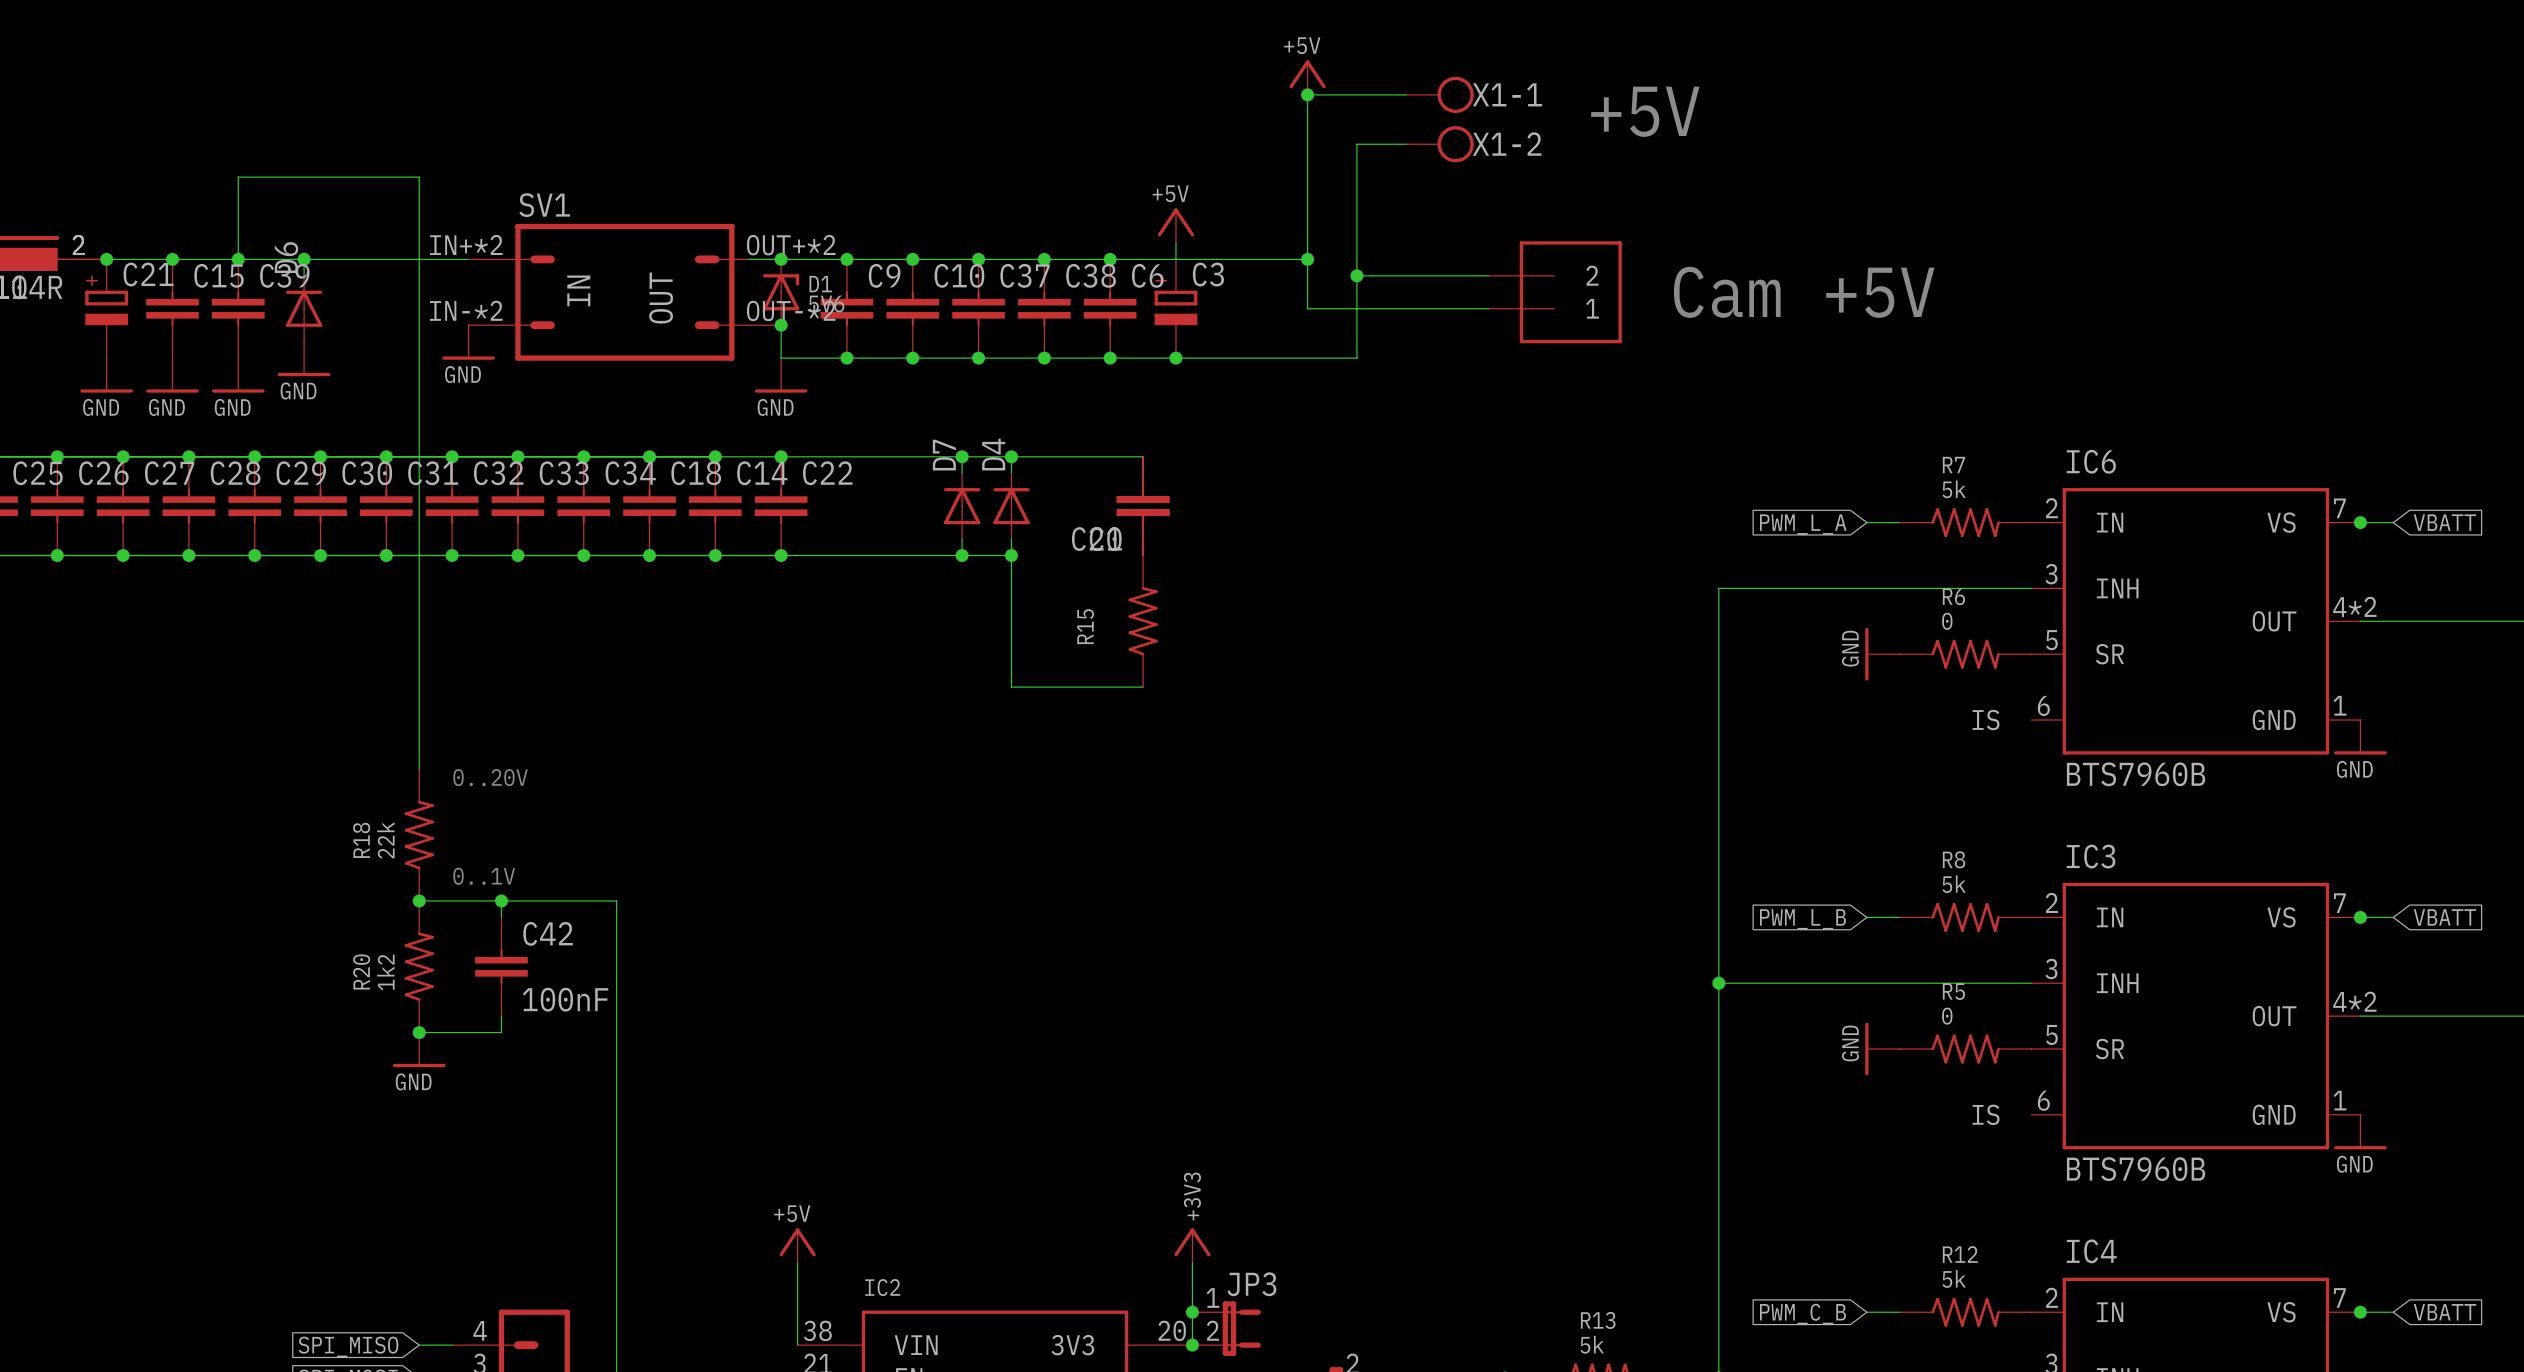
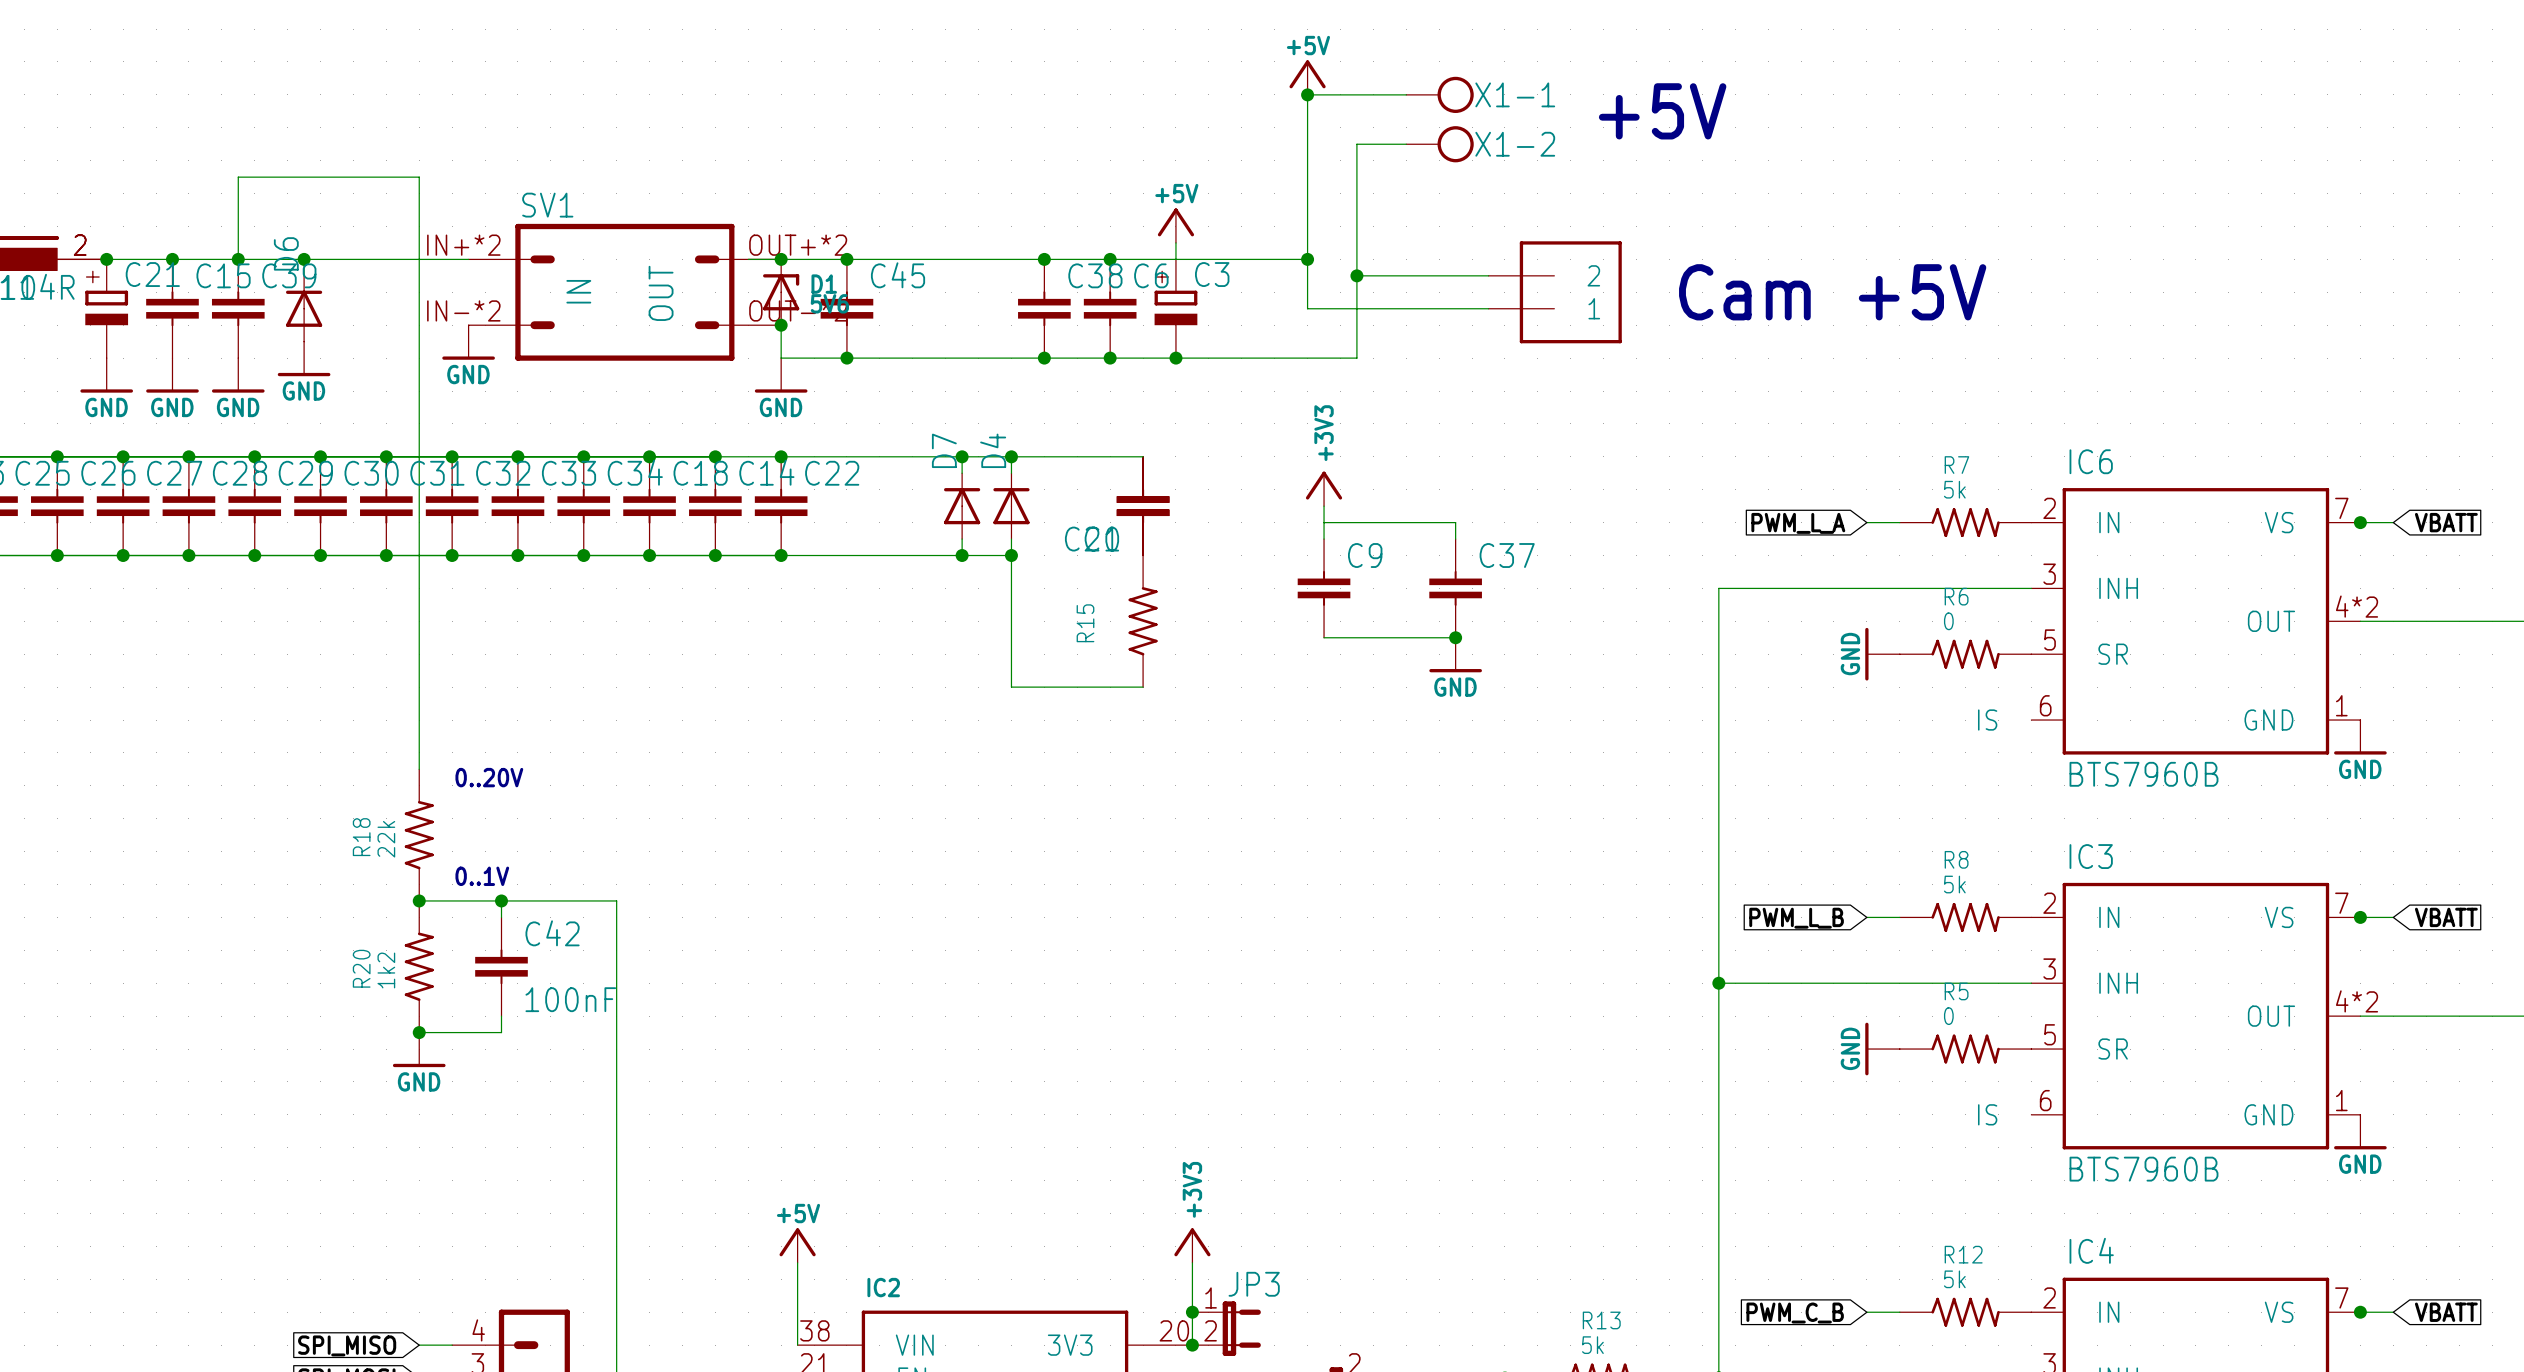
junction: (912, 259) -> none
junction: (978, 259) -> none
C9 name: C9 (884, 275) -> C45 (898, 275)
C10: (912, 308) -> none
C37 position: (978, 308) -> (1455, 588)
junction: (912, 358) -> none
junction: (978, 358) -> none
power symbol: none -> +3V3 (1324, 488)
wire: none -> (1324, 506) (1324, 539)
wire: none -> (1324, 522) (1455, 522) (1455, 539)
C9: none -> (1324, 588)
wire: none -> (1324, 637) (1455, 637)
junction: none -> (1455, 637)
power symbol: none -> GND (1455, 655)

